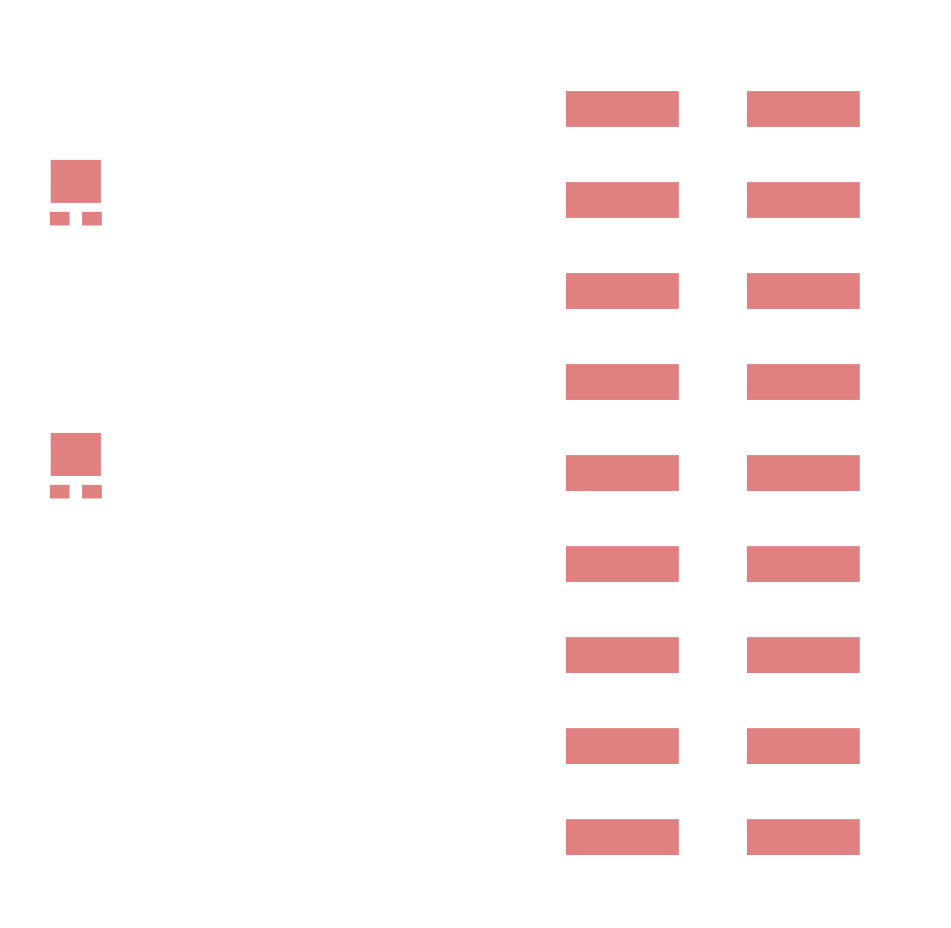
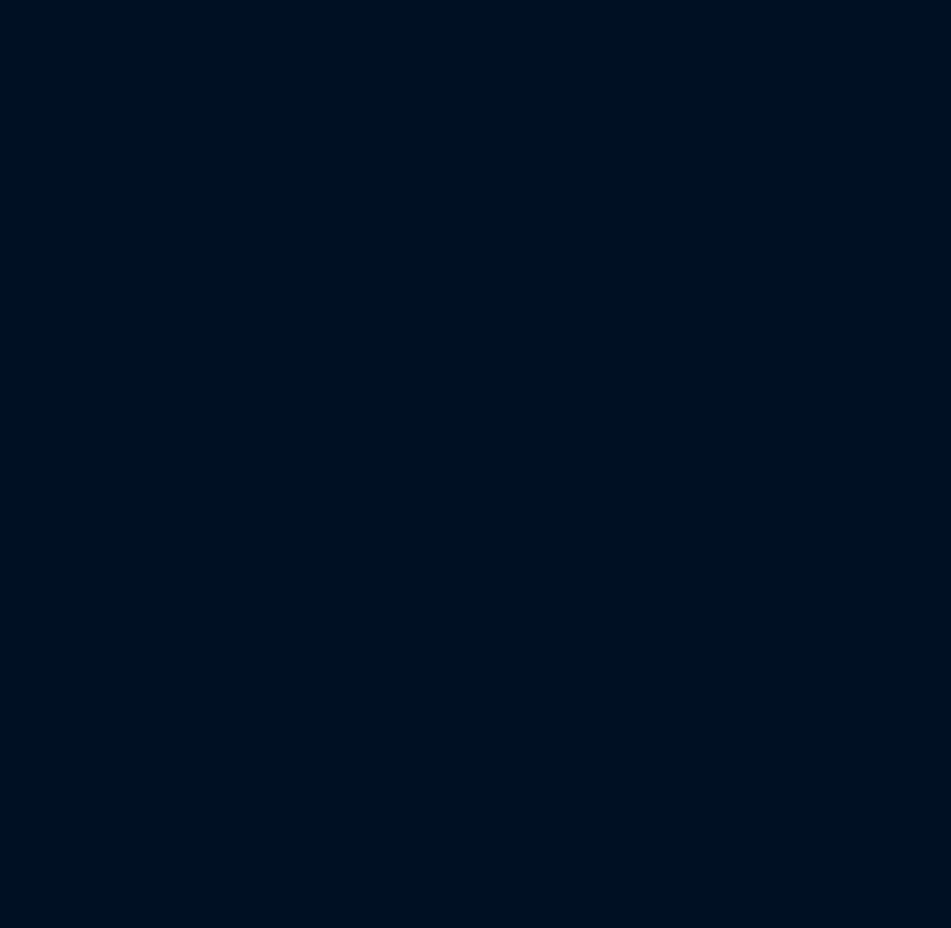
part: (75, 192) -> none
part: (75, 465) -> none
part: (712, 473) -> none

